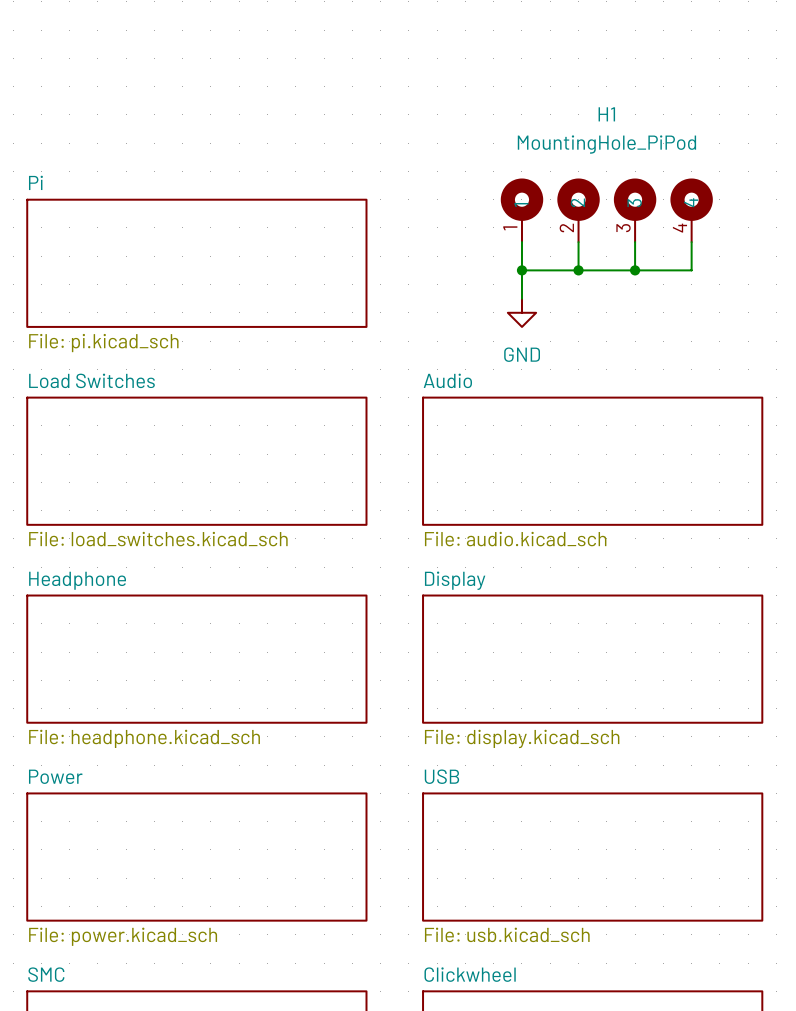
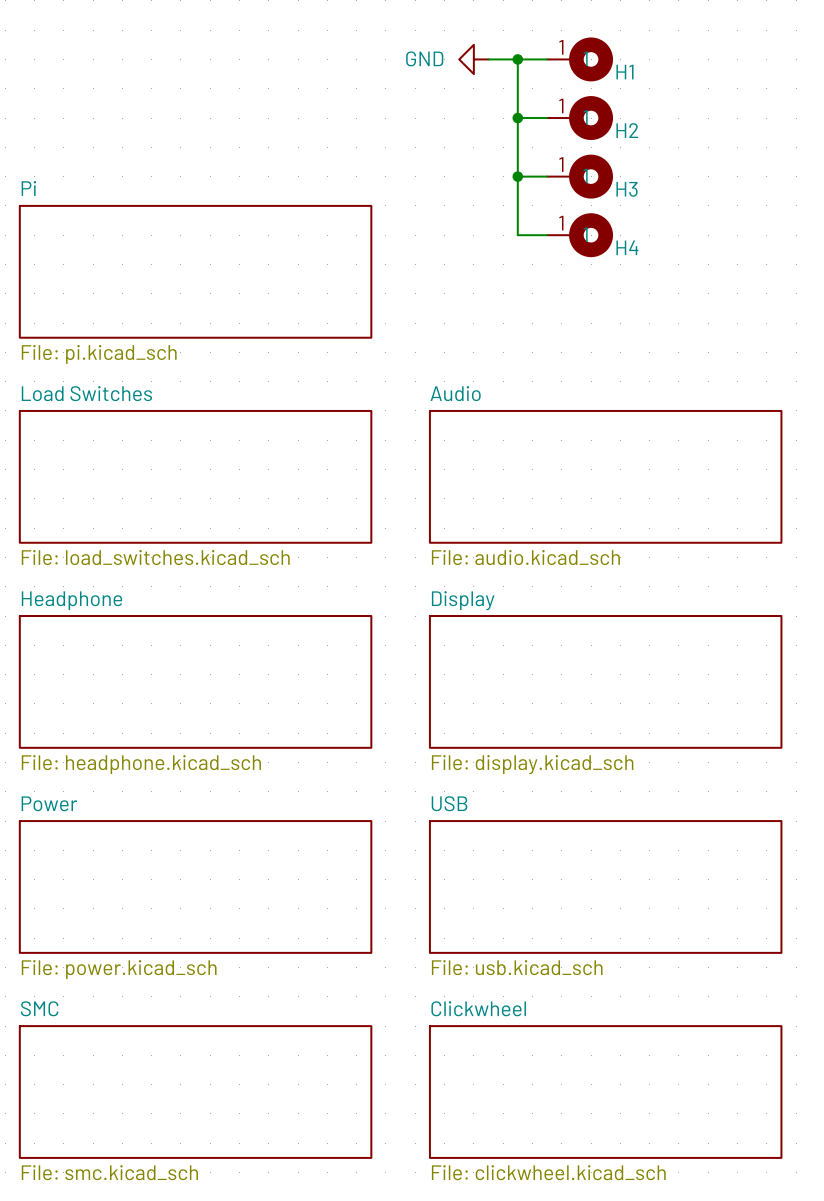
wire: none -> (488, 59) (547, 59)
wire: none -> (517, 59) (517, 235) (547, 235)
junction: none -> (517, 59)
wire: none -> (517, 118) (547, 118)
junction: none -> (517, 118)
H2: none -> (580, 118)
H1 name position: H1 (606, 114) -> H1 (624, 72)
H1 value: MountingHole_PiPod (606, 144) -> none
wire: none -> (517, 176) (547, 176)
junction: none -> (517, 176)
H3: none -> (580, 176)
H1 symbol: [500, 178, 713, 243] -> [547, 37, 614, 82]
H4: none -> (580, 235)
wire: (521, 242) (521, 298) -> none
wire: (578, 242) (578, 270) -> none
wire: (635, 242) (635, 270) -> none
wire: (691, 242) (691, 270) (521, 270) -> none
junction: (521, 270) -> none
junction: (578, 270) -> none
junction: (635, 270) -> none
power symbol rotation: 0° (521, 312) -> 90° clockwise (473, 59)
power symbol position: GND (521, 312) -> GND (473, 59)

